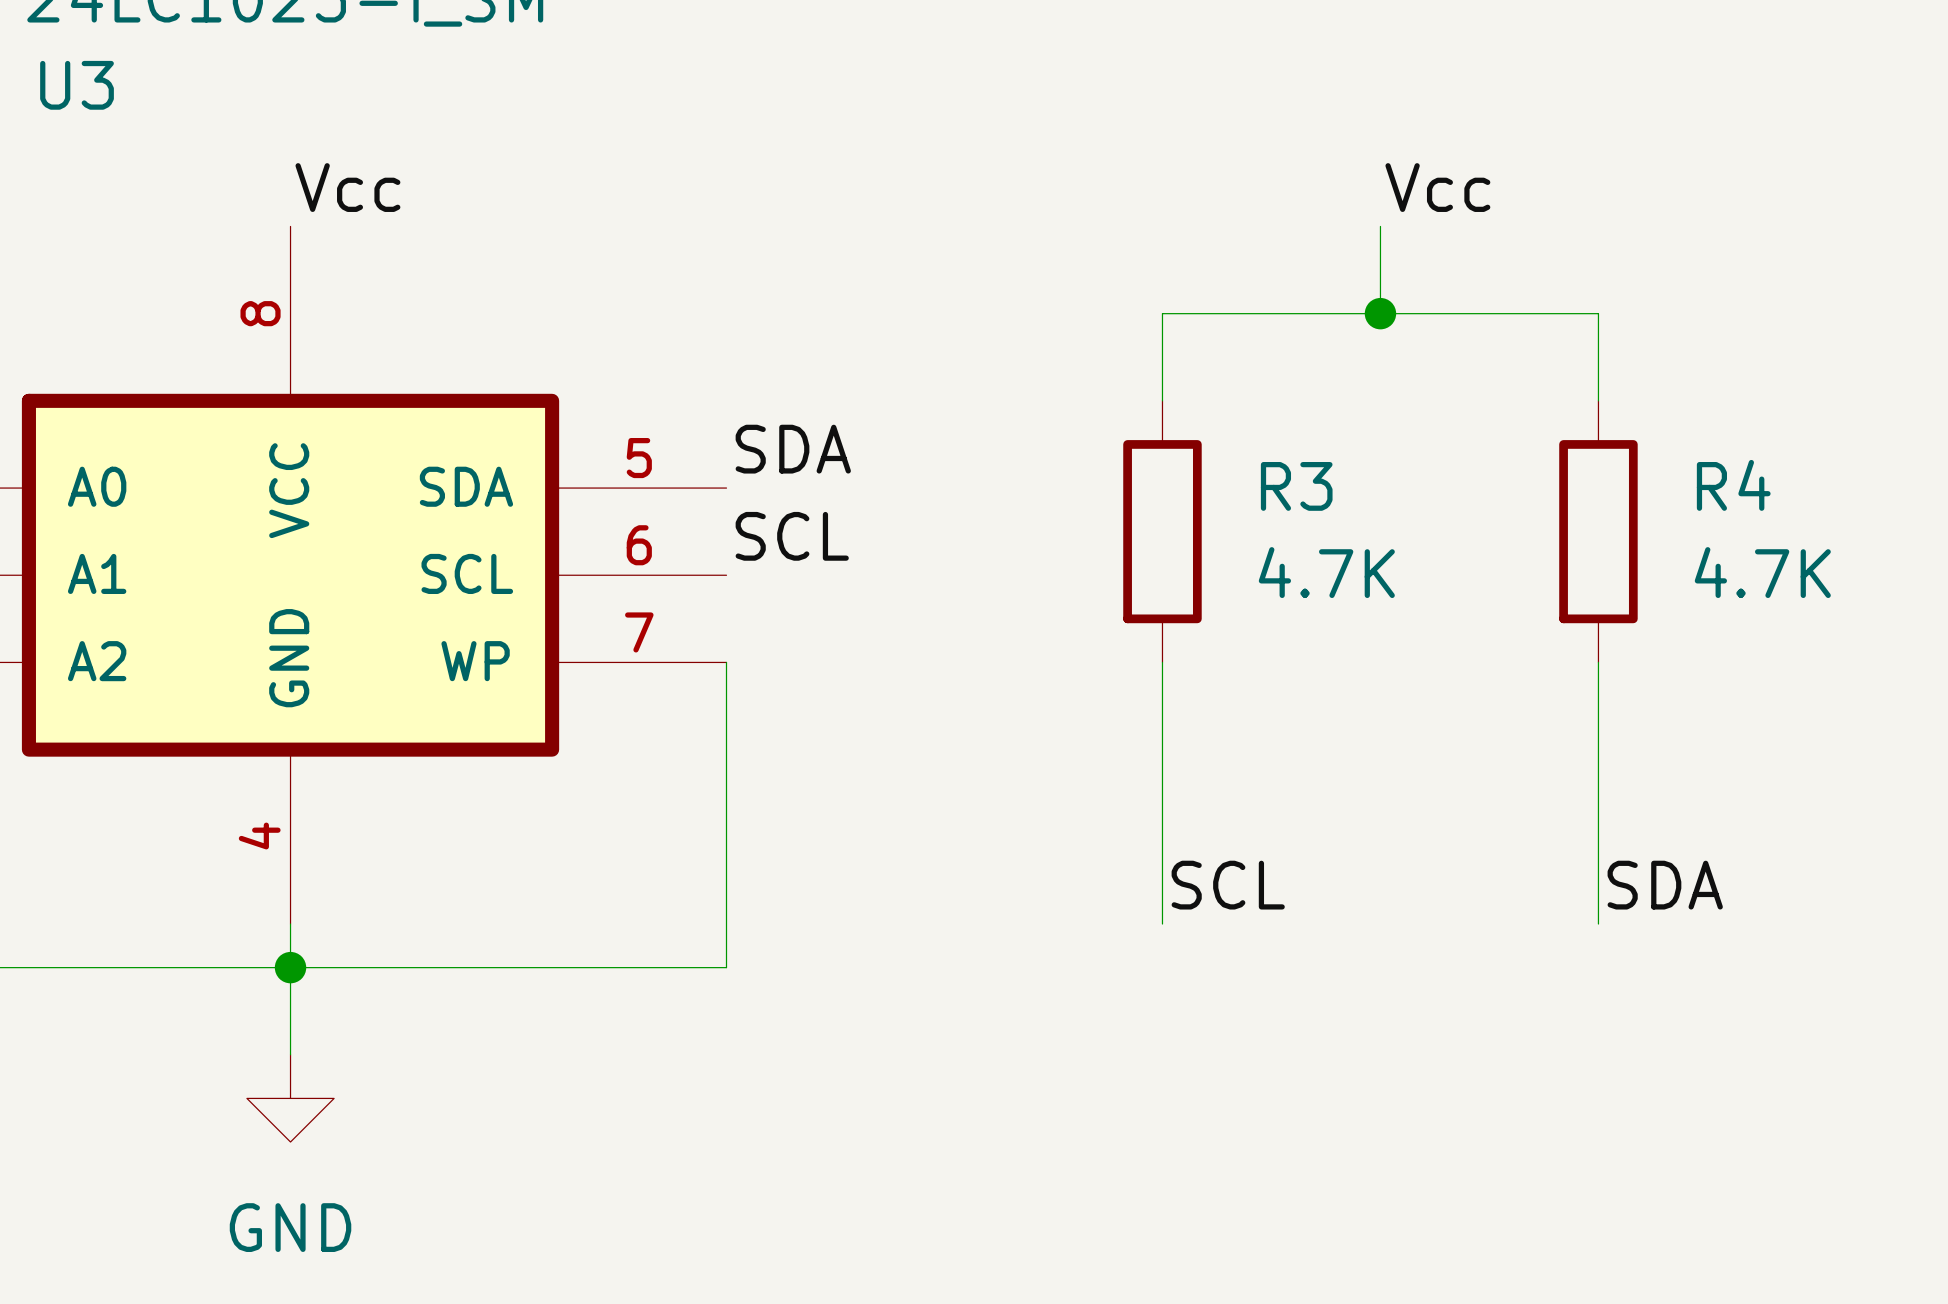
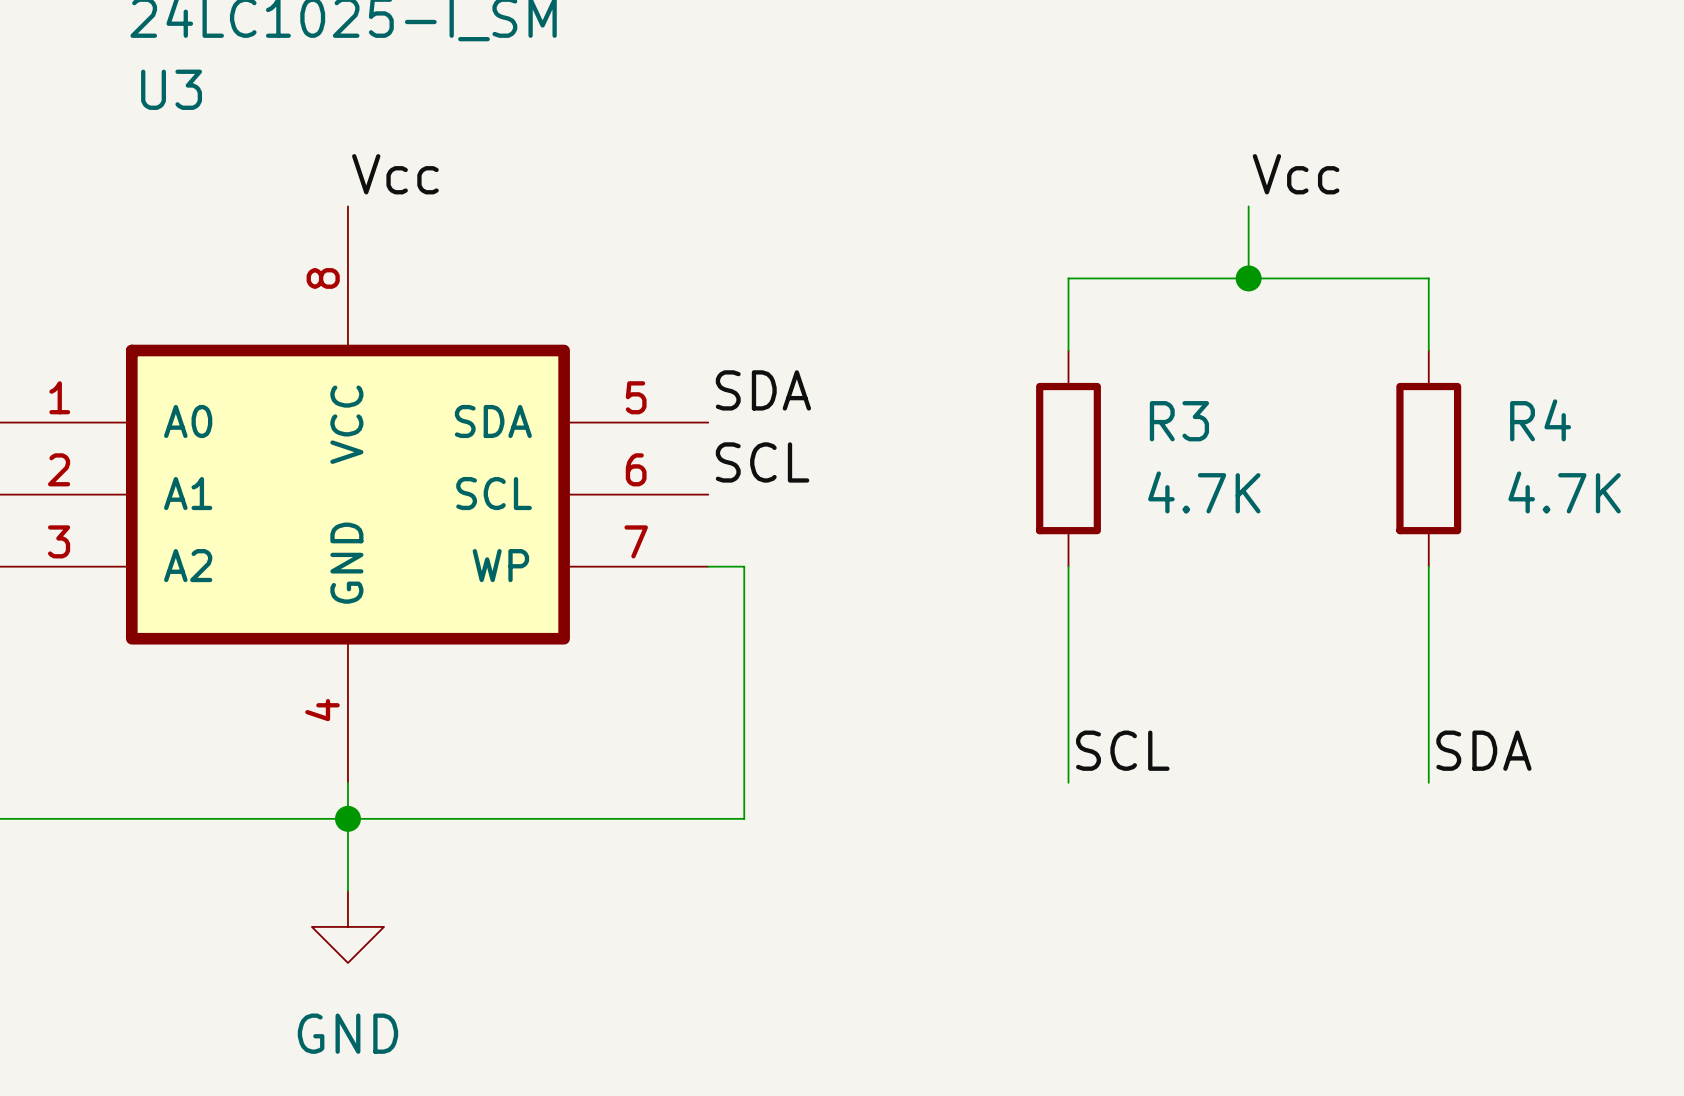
wire: (726, 662) (726, 967) -> (708, 566) (744, 566) (744, 818) (708, 818)

